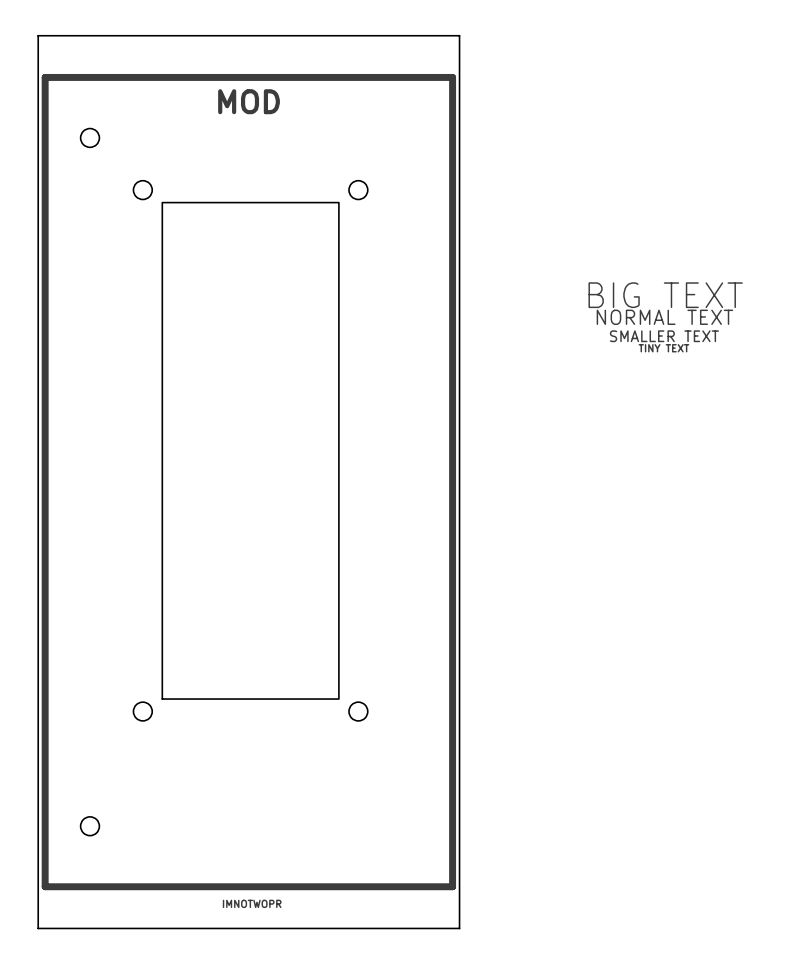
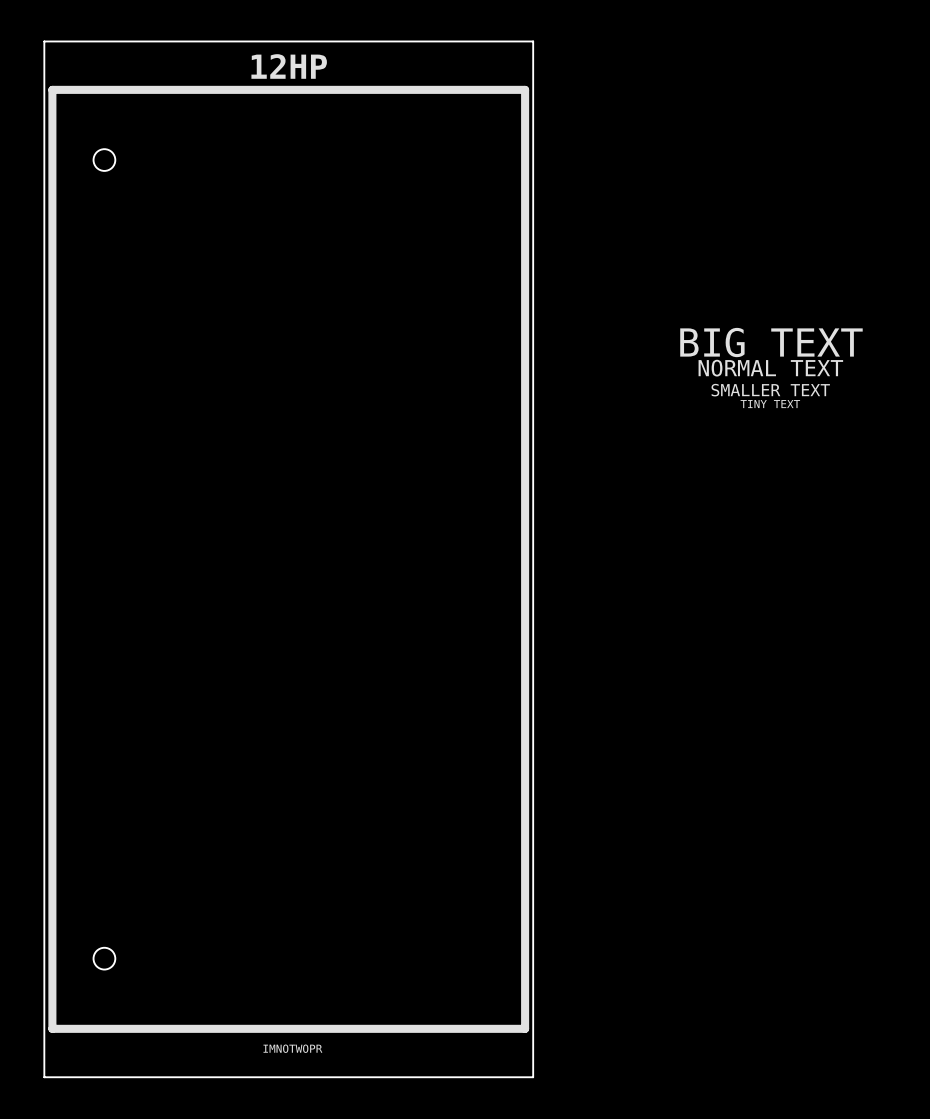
text: none -> 12HP (289, 66)
text: MOD (249, 101) -> none
part: (250, 450) -> none

